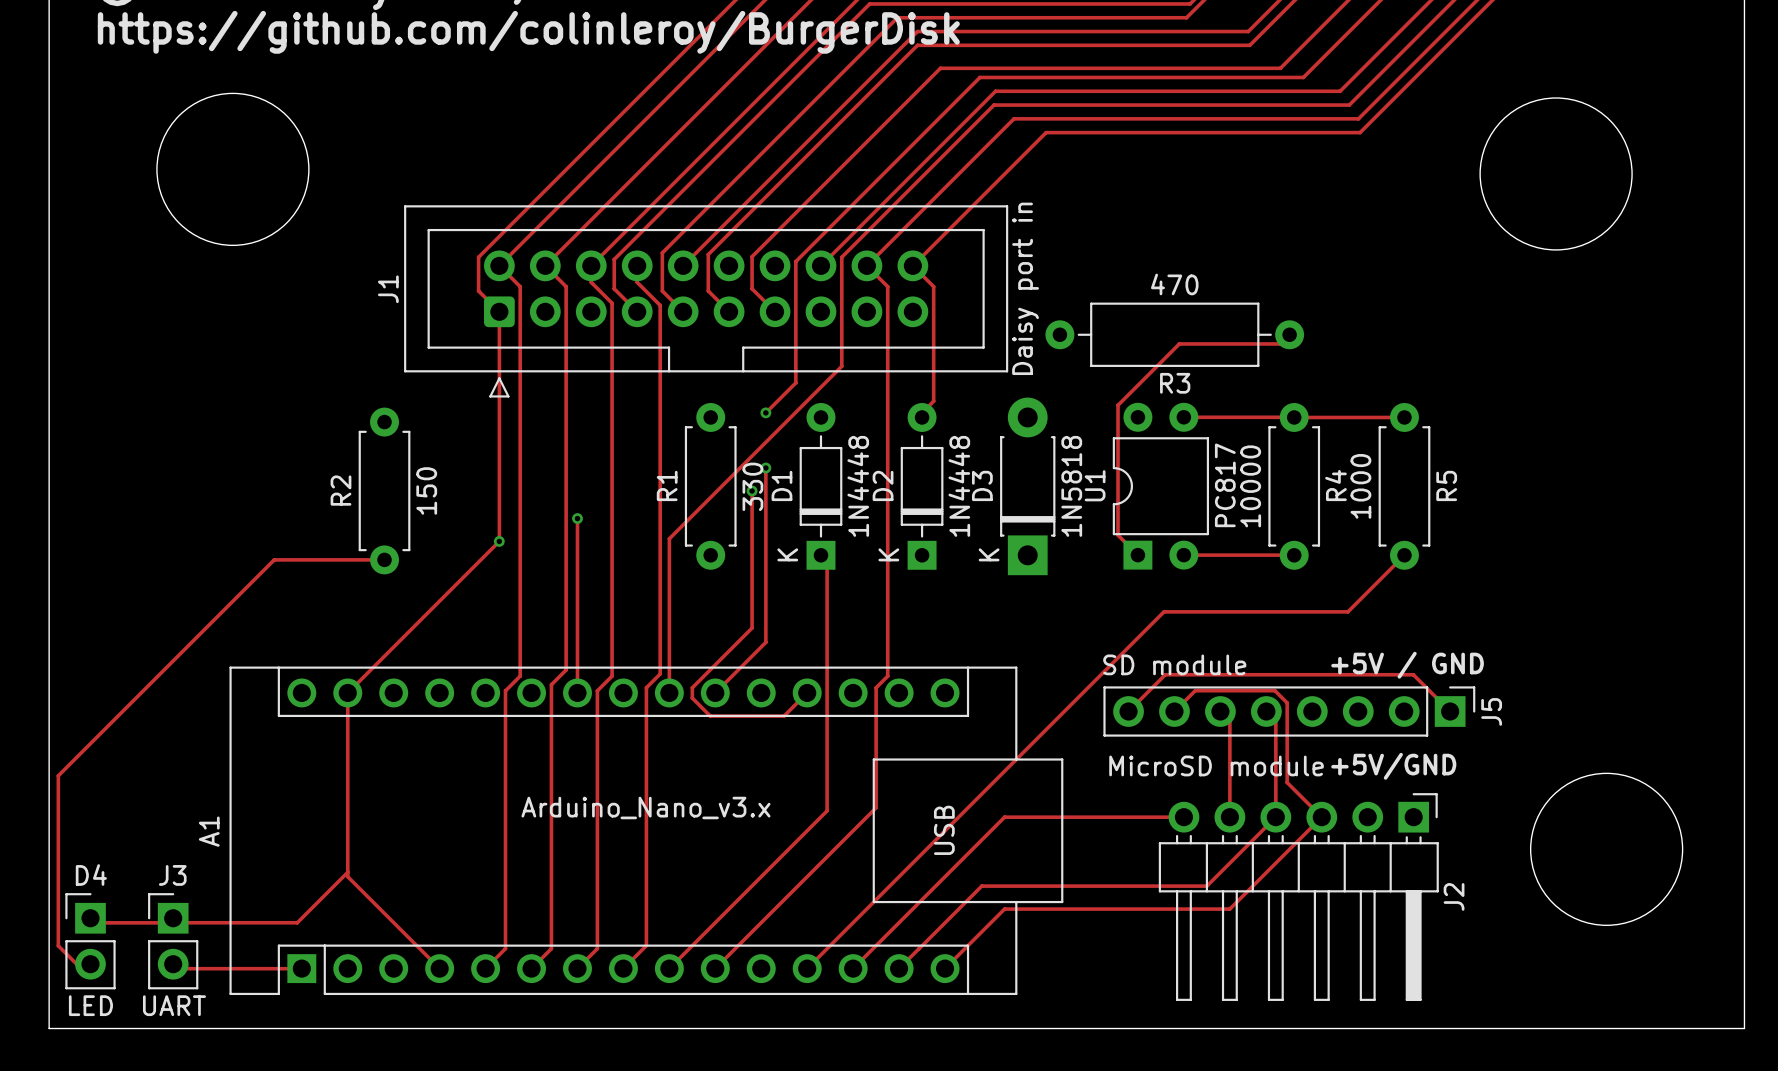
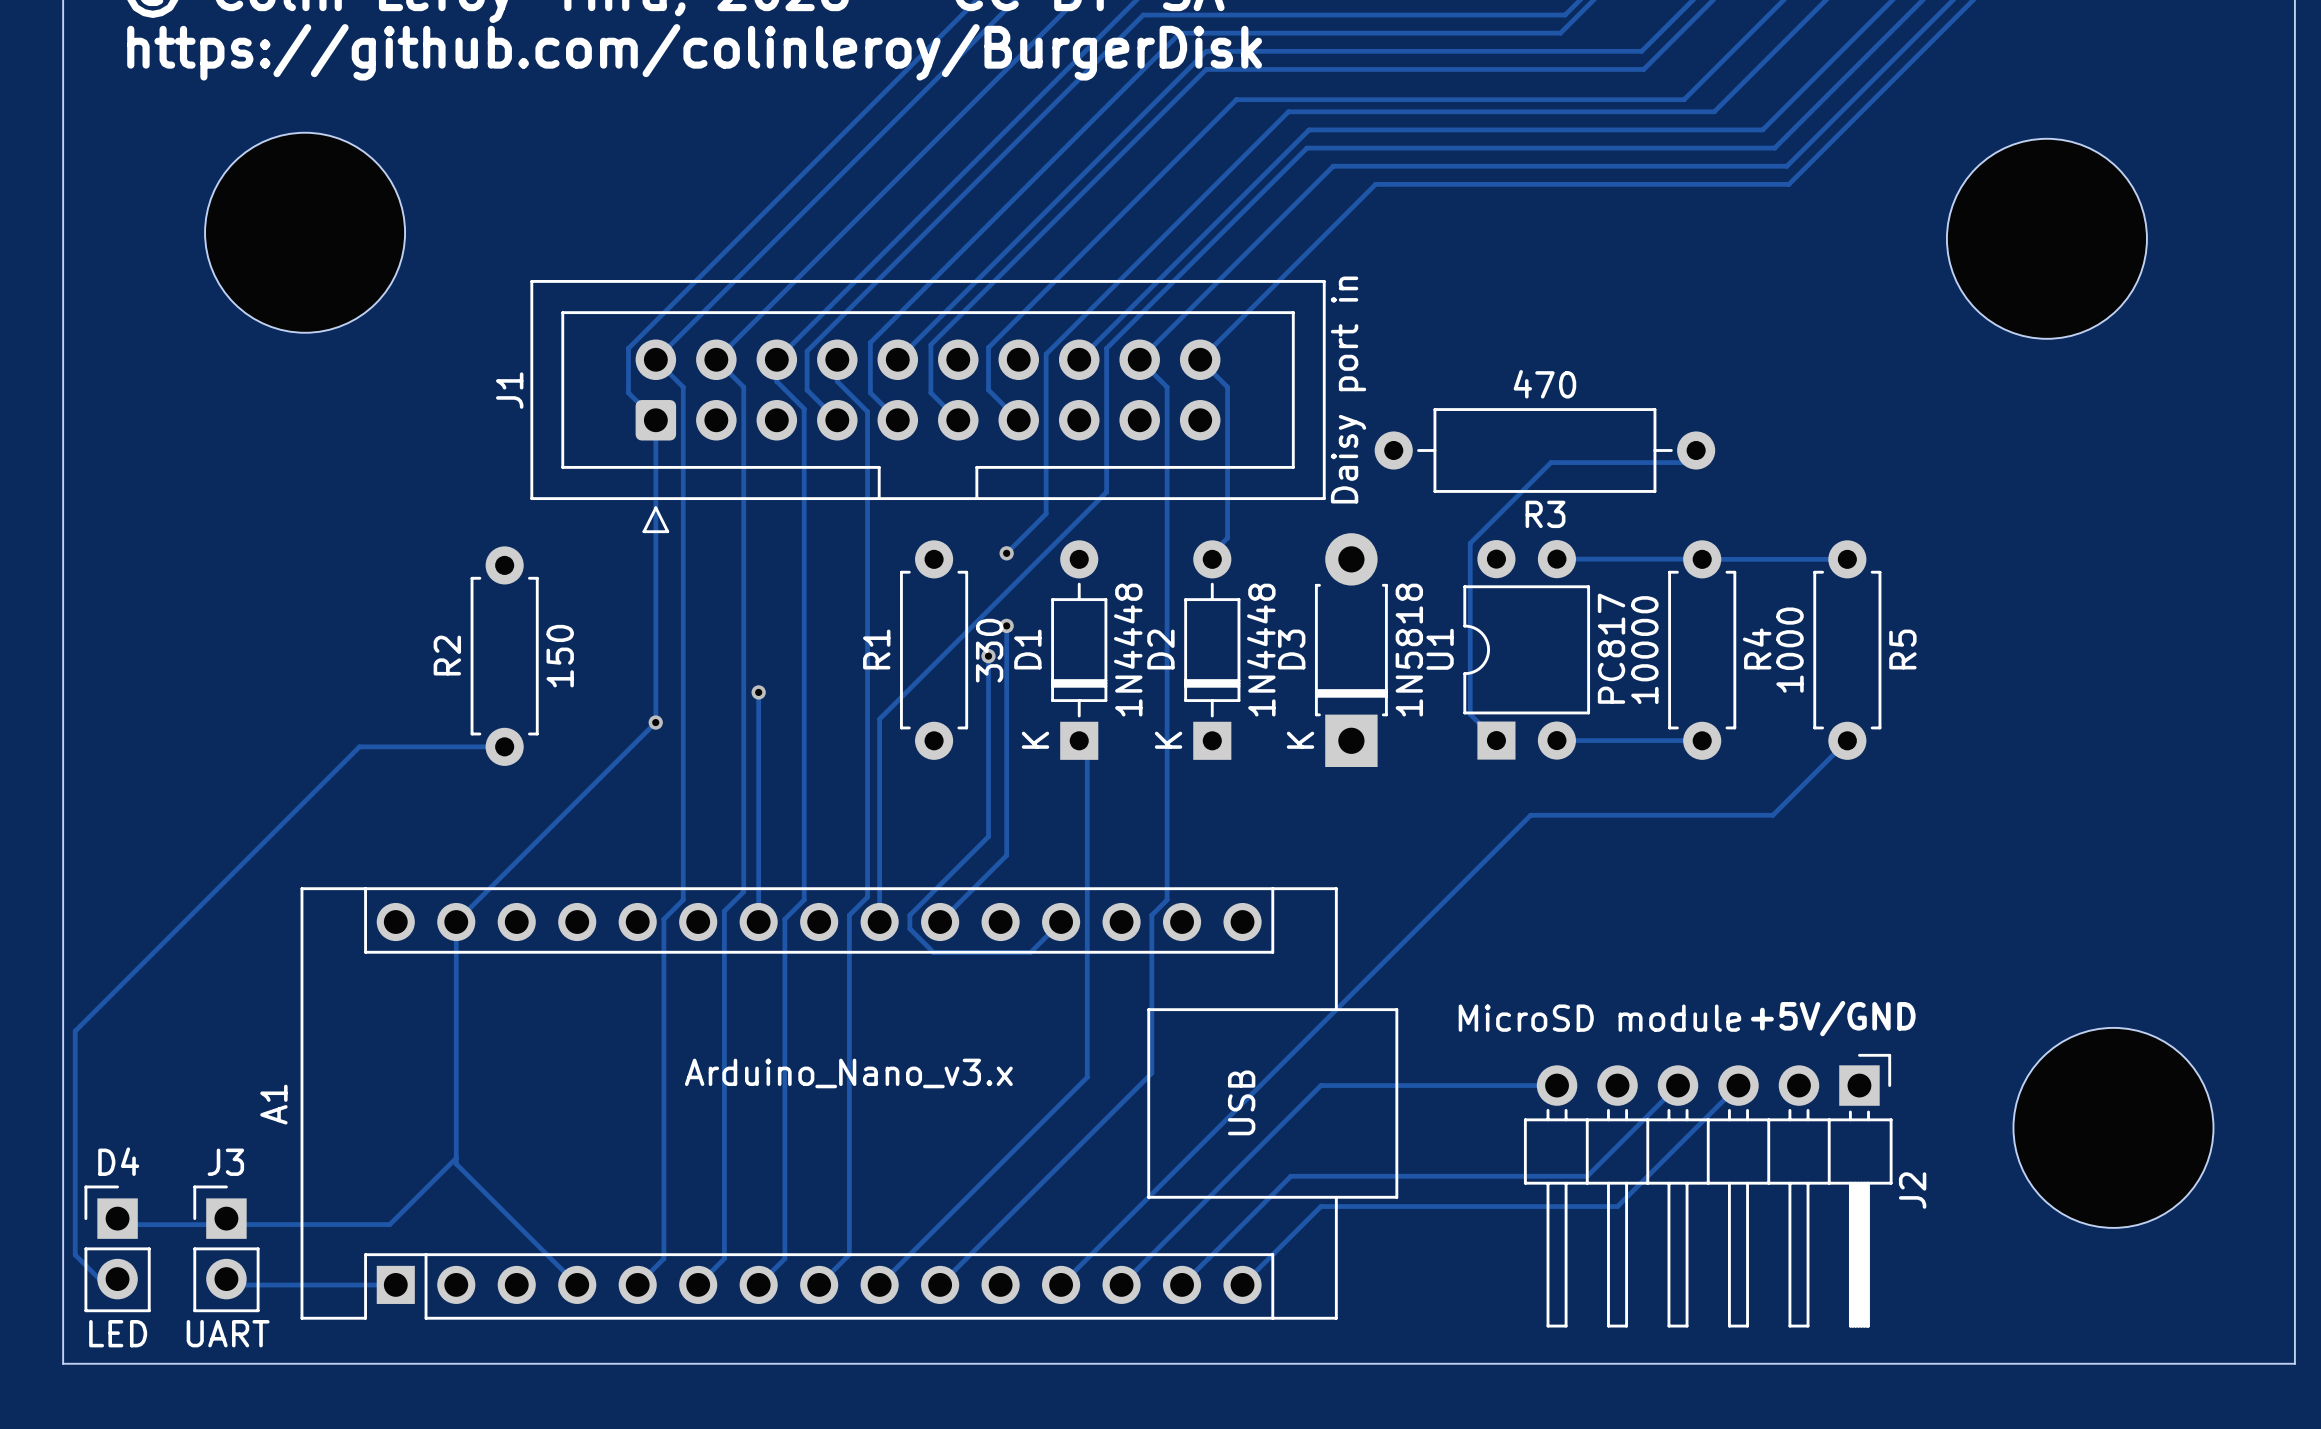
text: +5V / GND (1407, 665) -> none
track: (1128, 711) (1165, 674) (1413, 674) (1450, 711) -> none
track: (1174, 711) (1195, 690) (1274, 690) (1287, 702) (1287, 782) (1321, 817) -> none
track: (1220, 711) (1229, 720) (1229, 817) -> none
track: (1266, 711) (1275, 720) (1275, 817) -> none
J5: SD module (1289, 711) -> none

